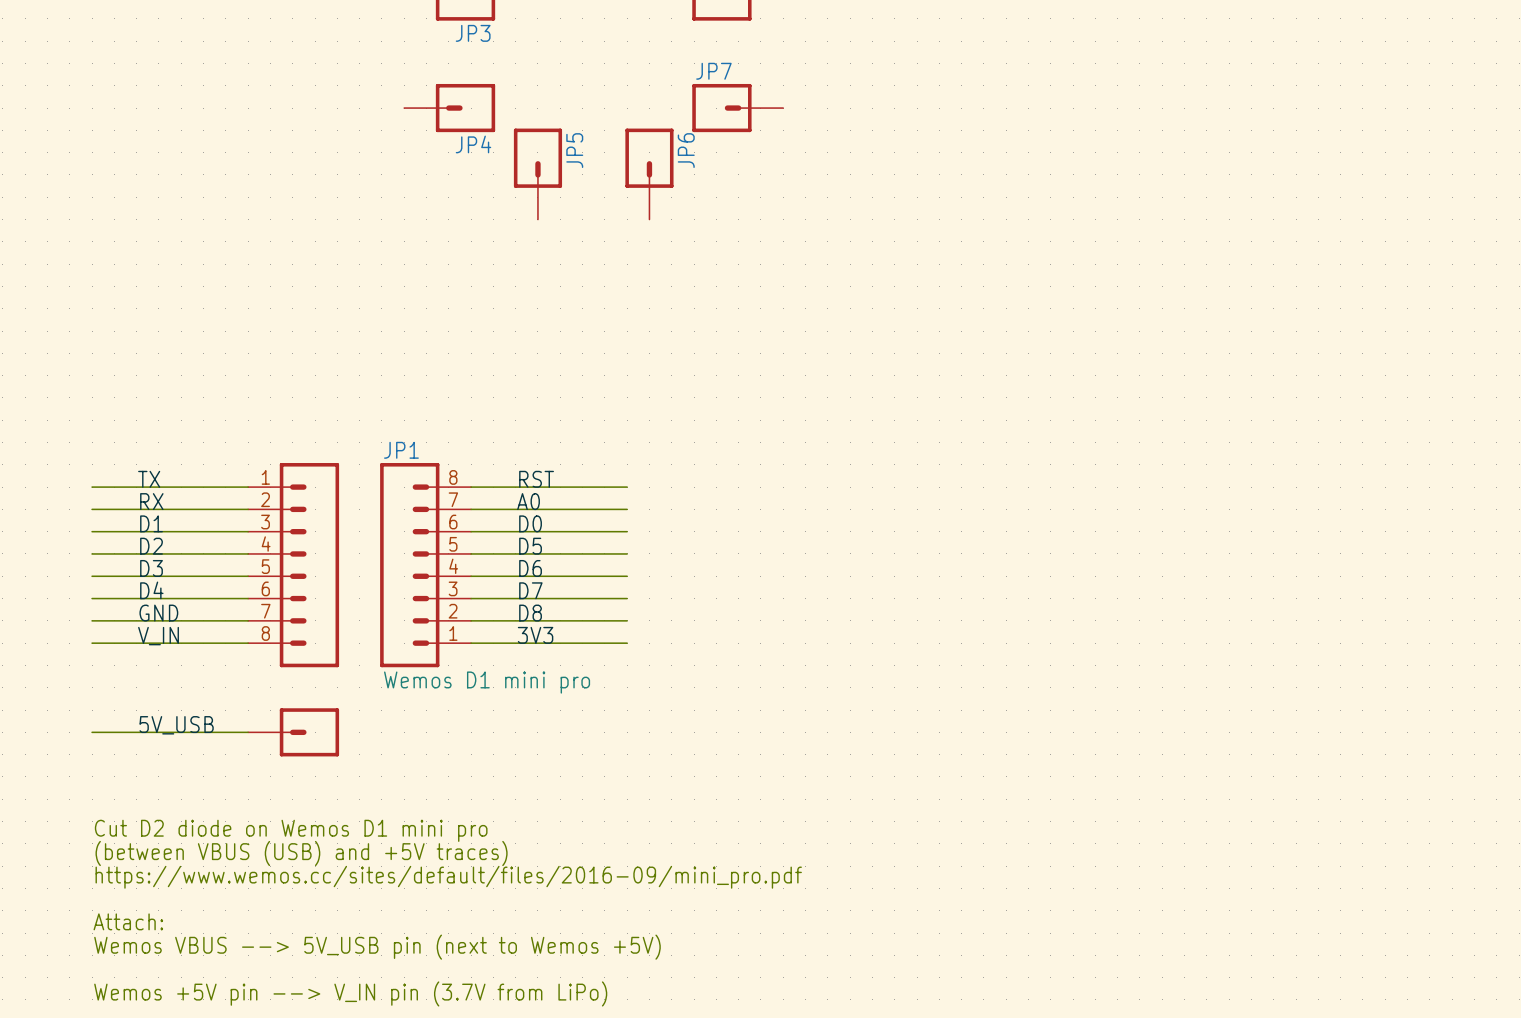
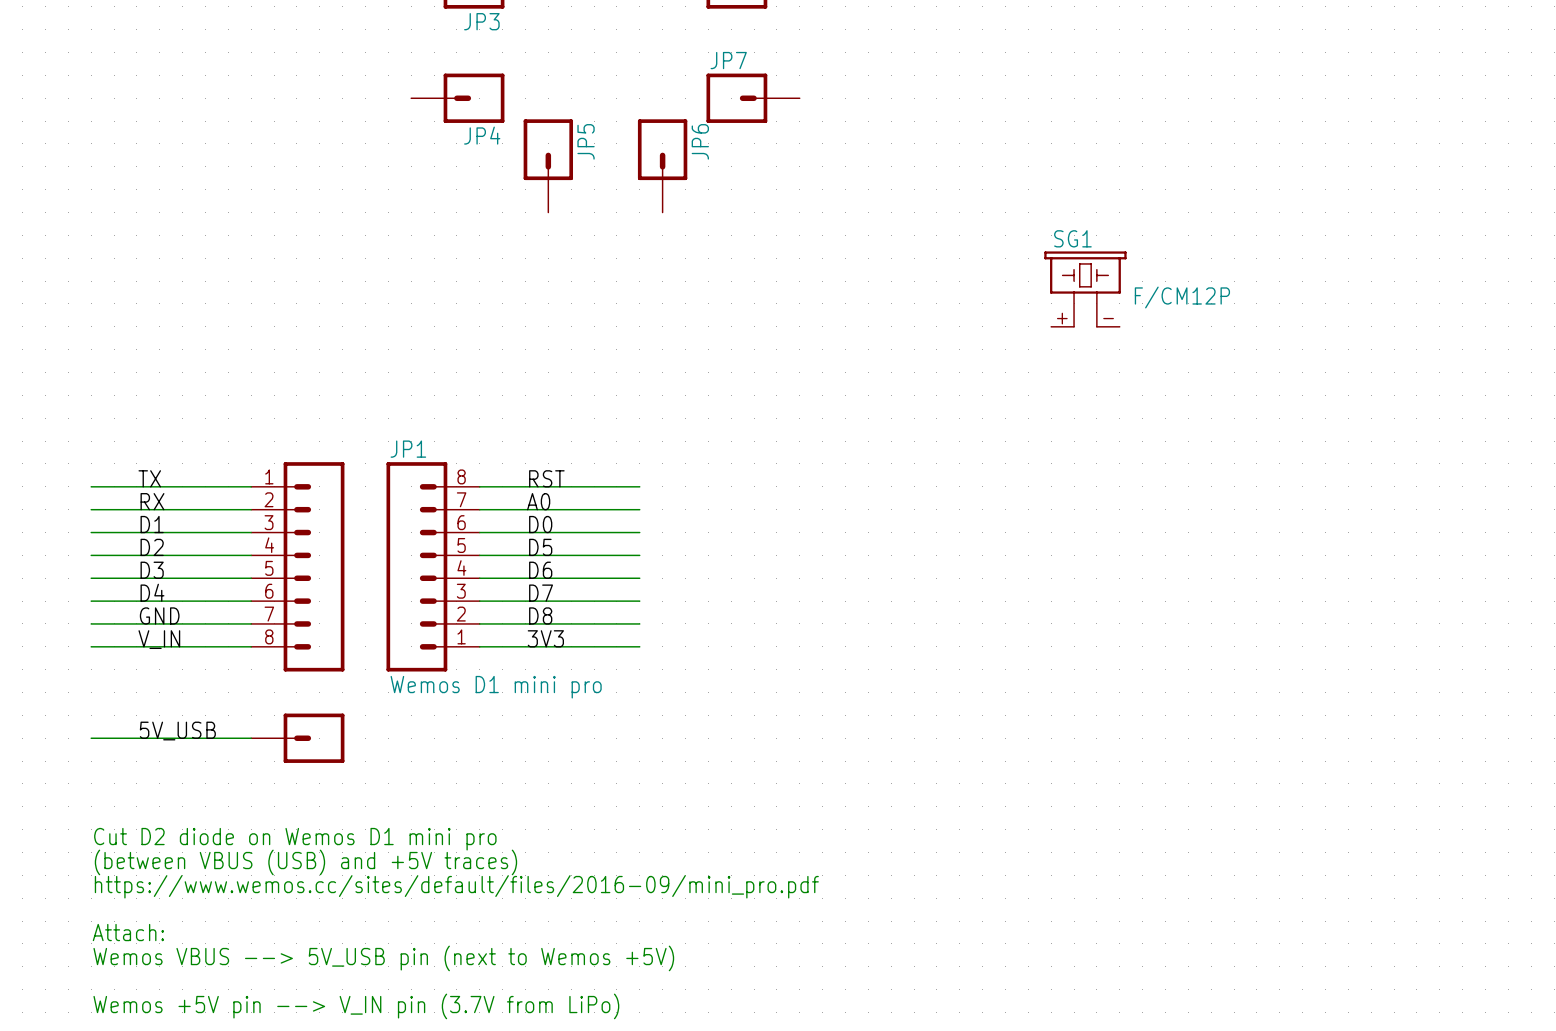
SG1: none -> F/CM12P (1085, 289)

